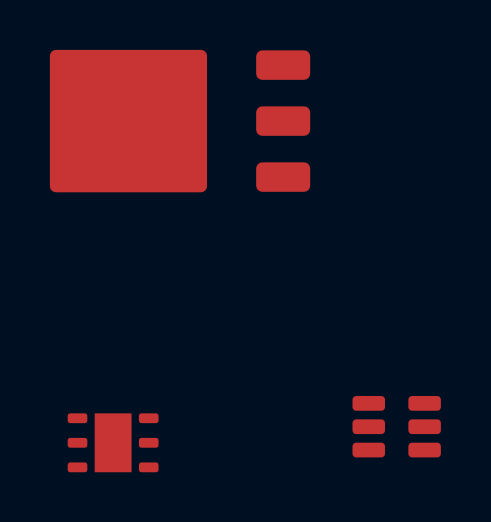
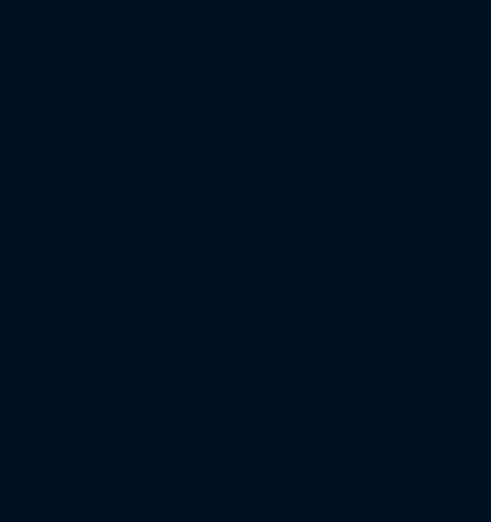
part: (180, 121) -> none
part: (396, 426) -> none
part: (113, 442) -> none

